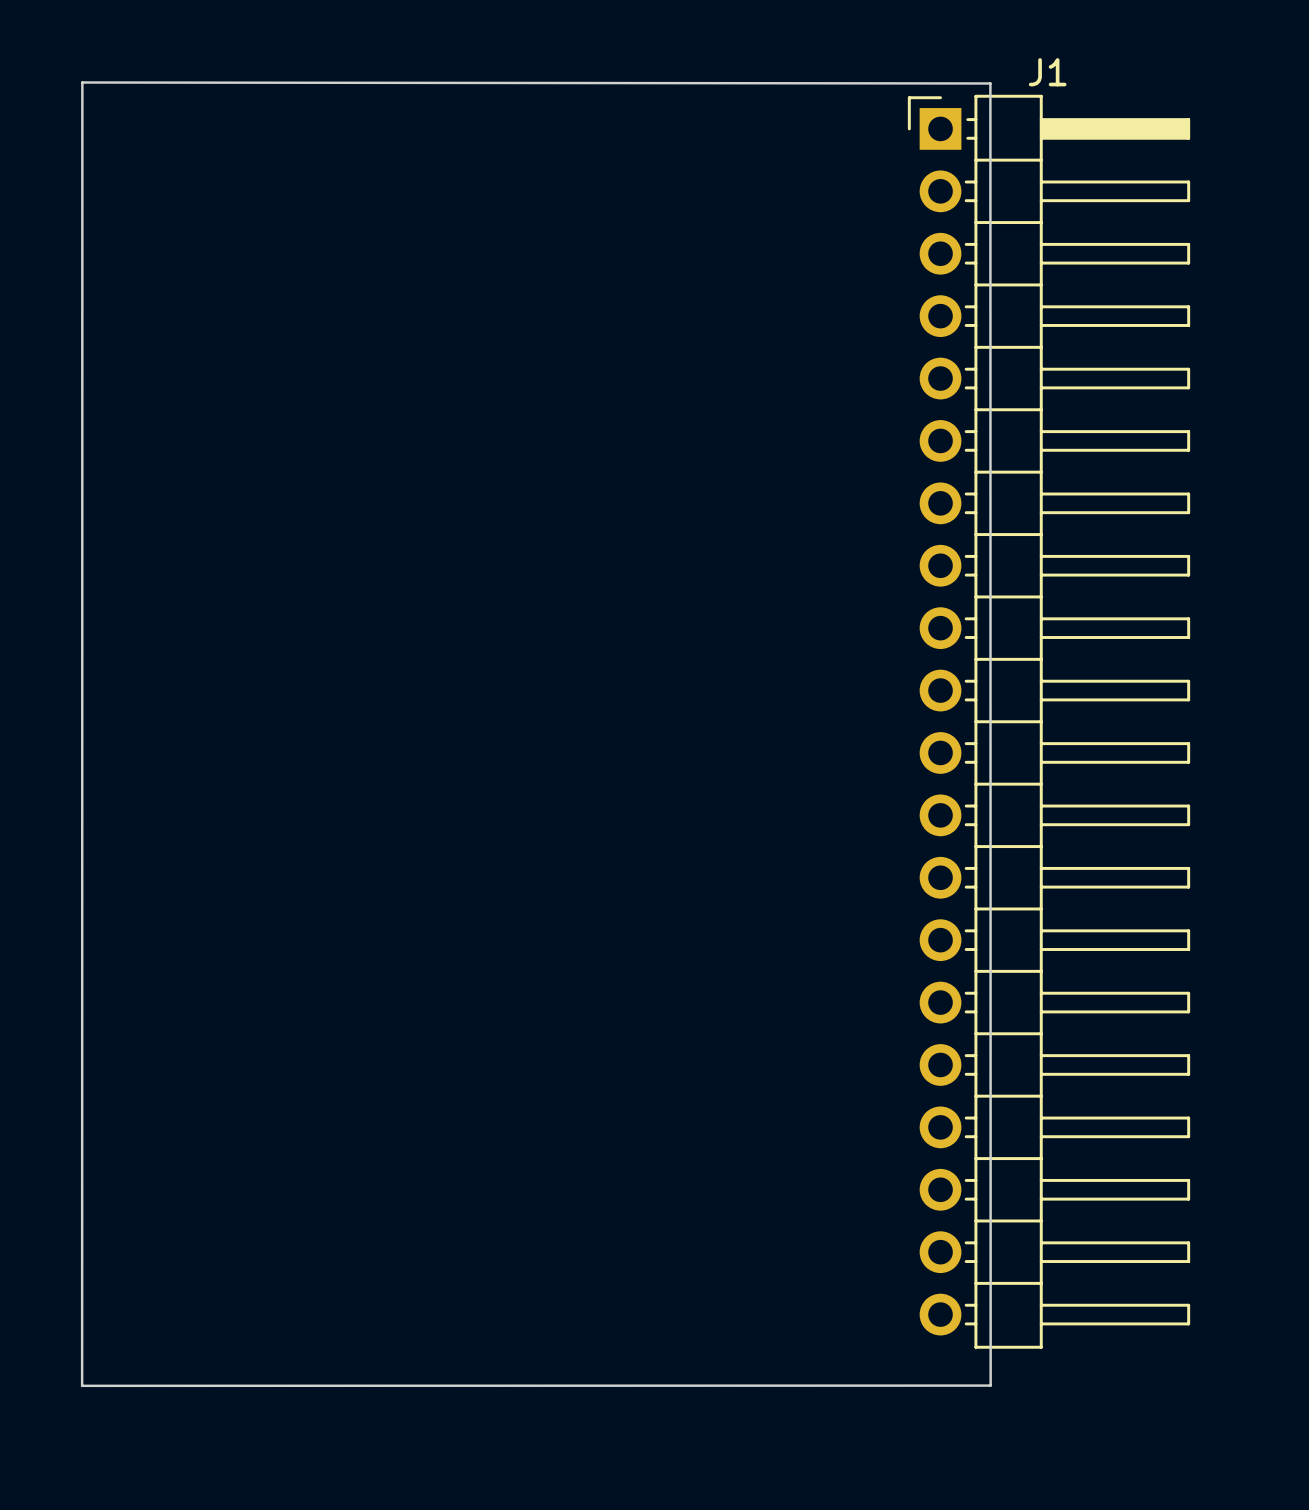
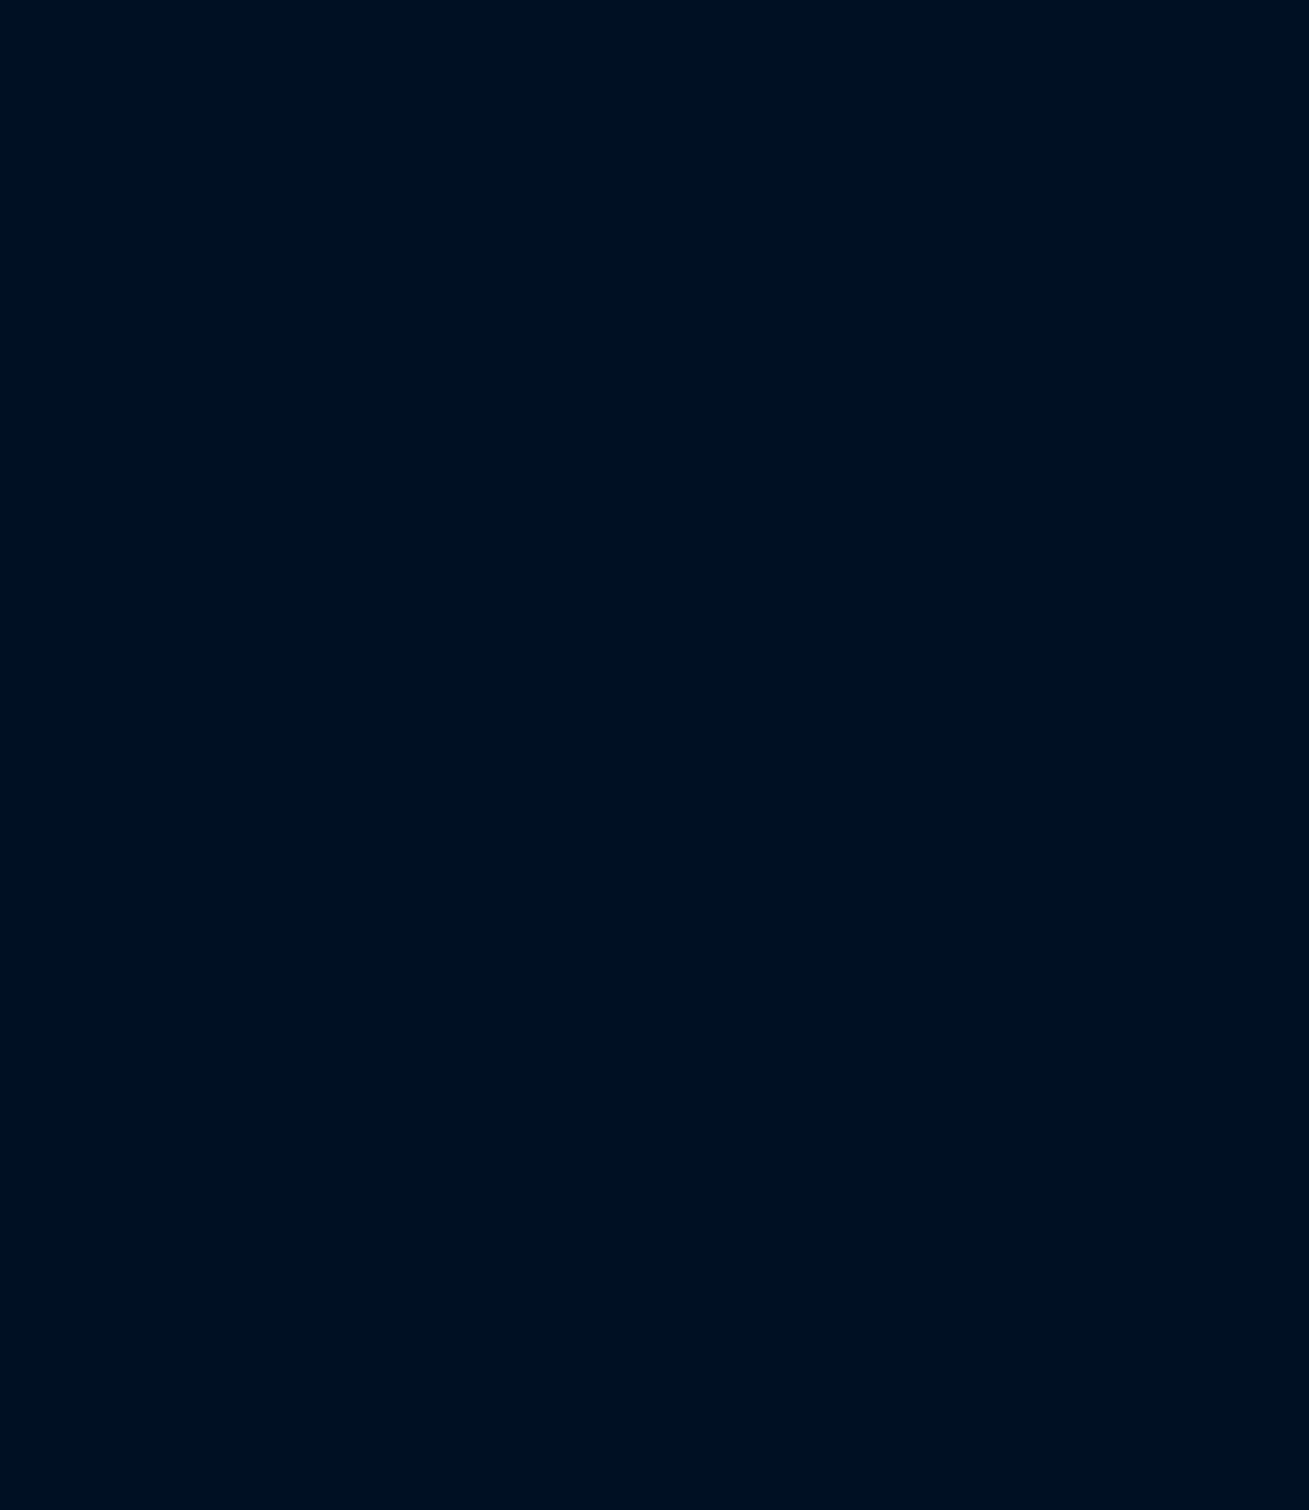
board edge: (82, 82) (82, 1385) (990, 1385) (990, 83) (82, 82) -> none
J1: (1048, 721) -> none

